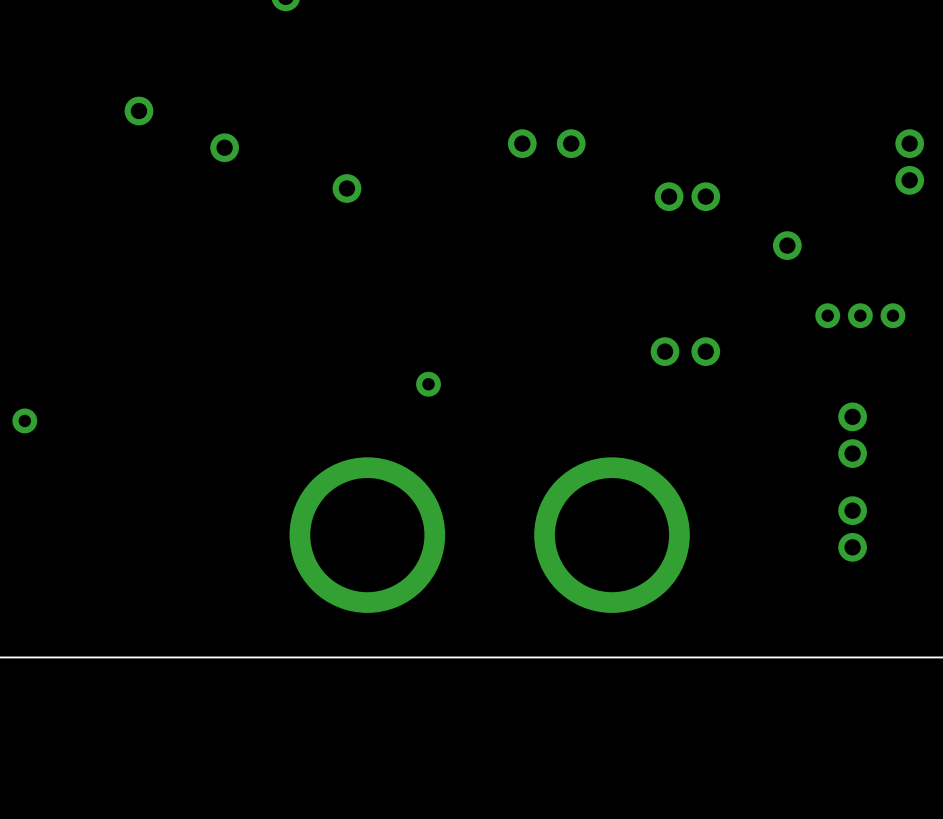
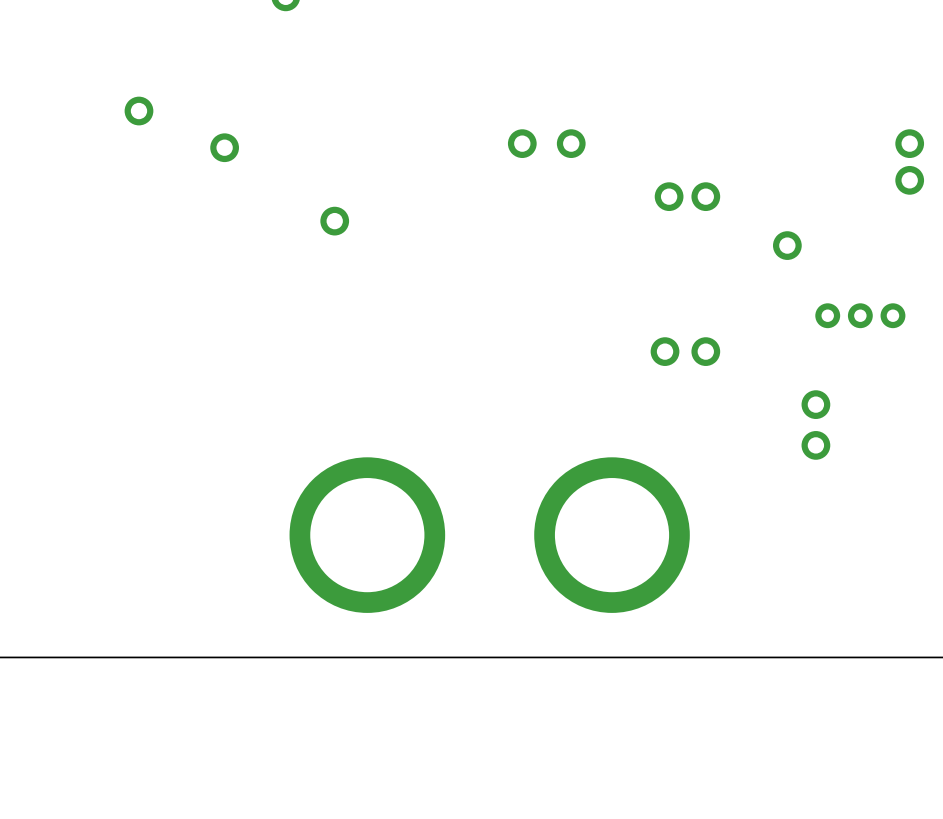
via position: (346, 188) -> (334, 221)
via: (428, 384) -> none
via: none -> (815, 404)
via: (852, 416) -> none
via: (24, 420) -> none
via: none -> (815, 445)
via: (852, 453) -> none
via: (852, 510) -> none
via: (852, 547) -> none

